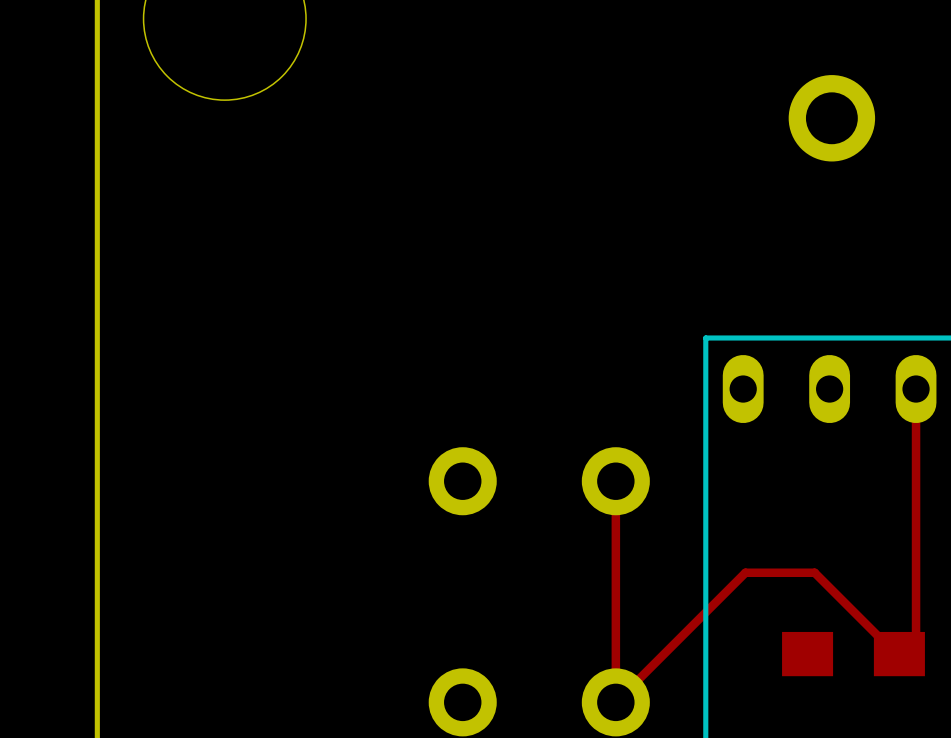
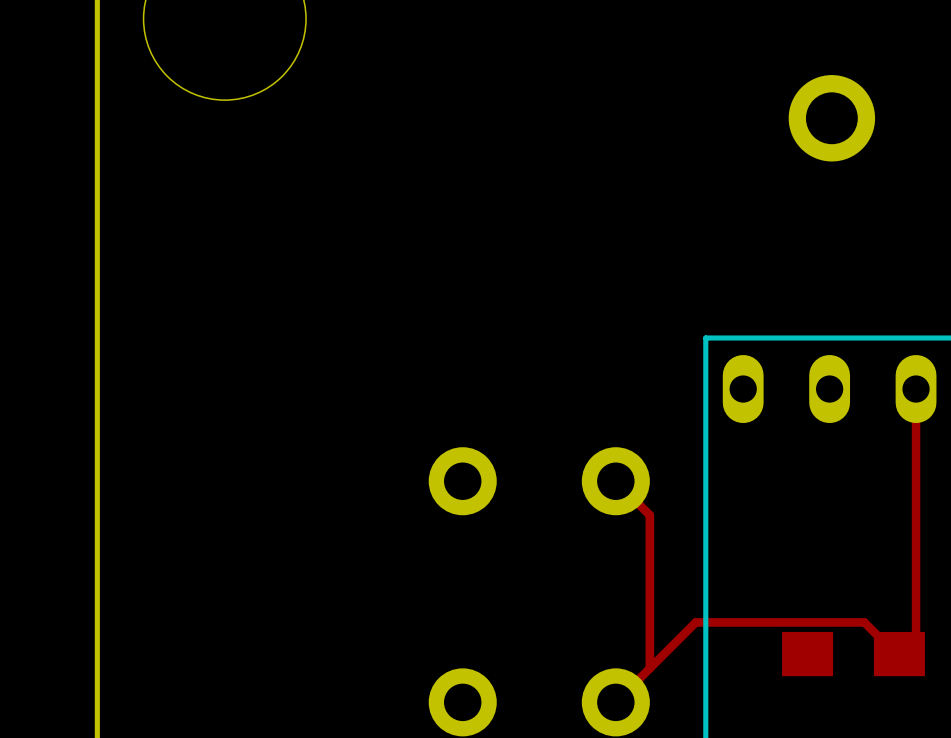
top track: (615, 481) (615, 702) -> (615, 481) (649, 515) (649, 668)
top track: (864, 622) (814, 572) (745, 572) (695, 622) -> (864, 622) (695, 622)

